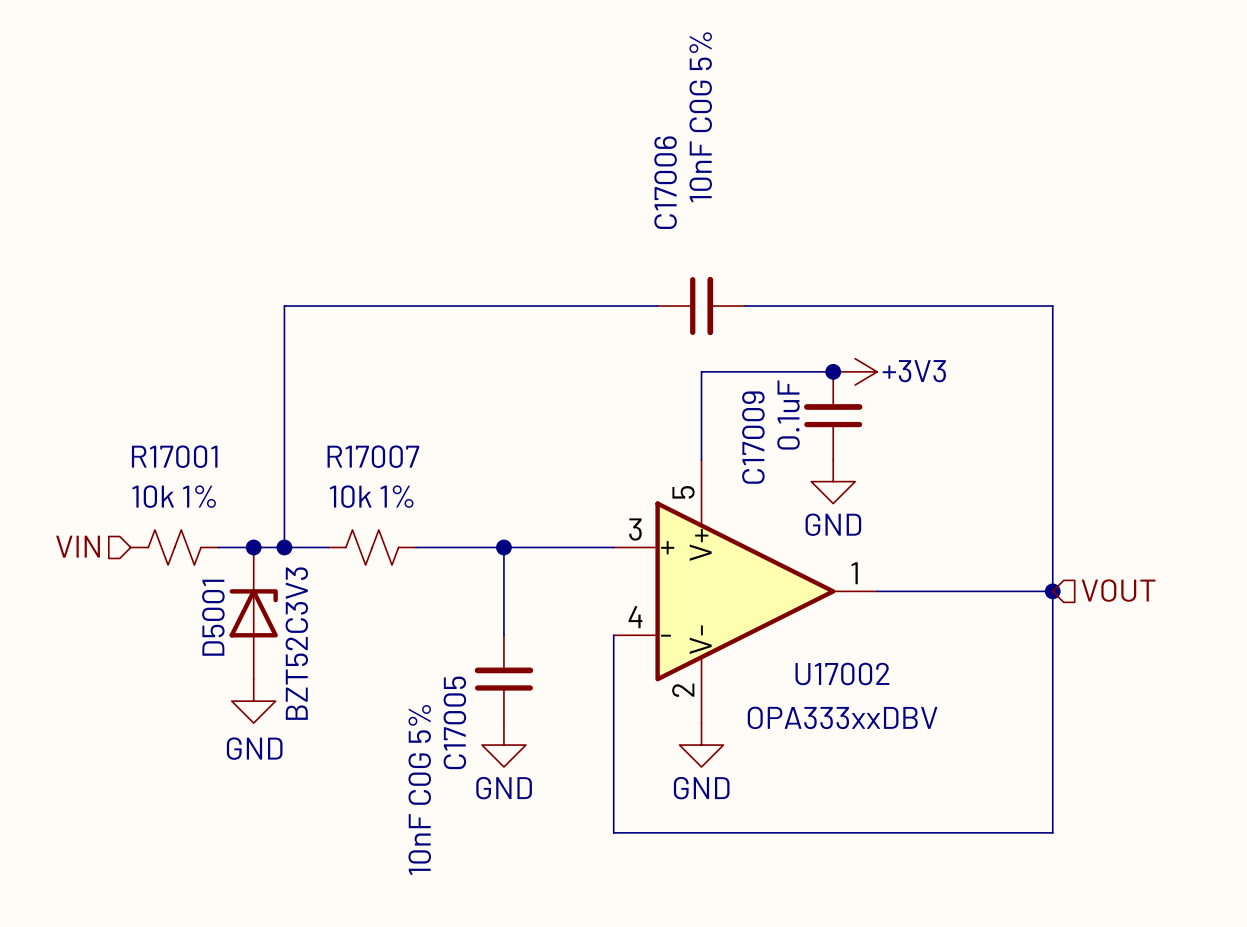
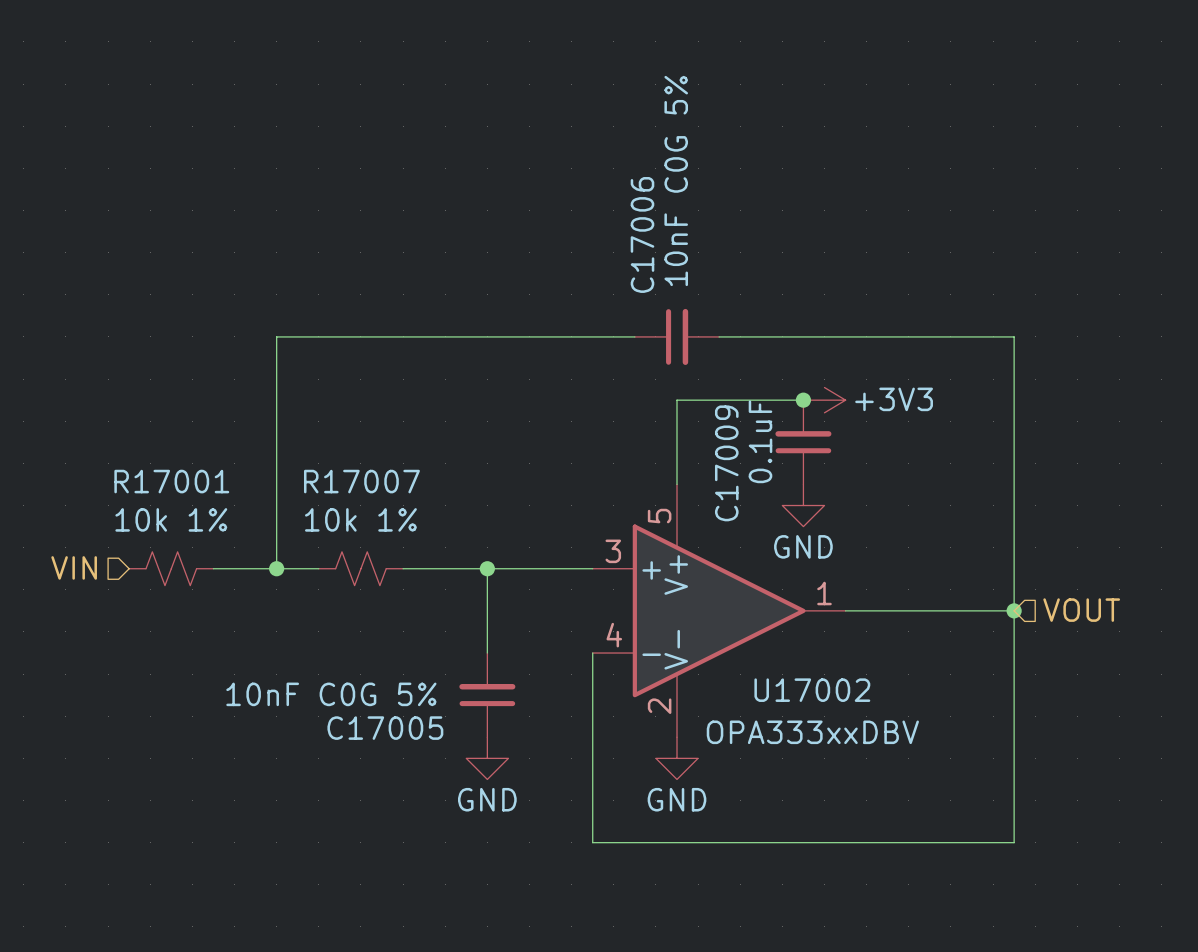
junction: (253, 547) -> none
D5001: BZT52C3V3 (253, 613) -> none
power symbol: GND (253, 701) -> none
C17005 name rotation: 0° (454, 722) -> 90° clockwise (385, 728)
C17005 value rotation: 0° (419, 789) -> 90° clockwise (331, 694)

